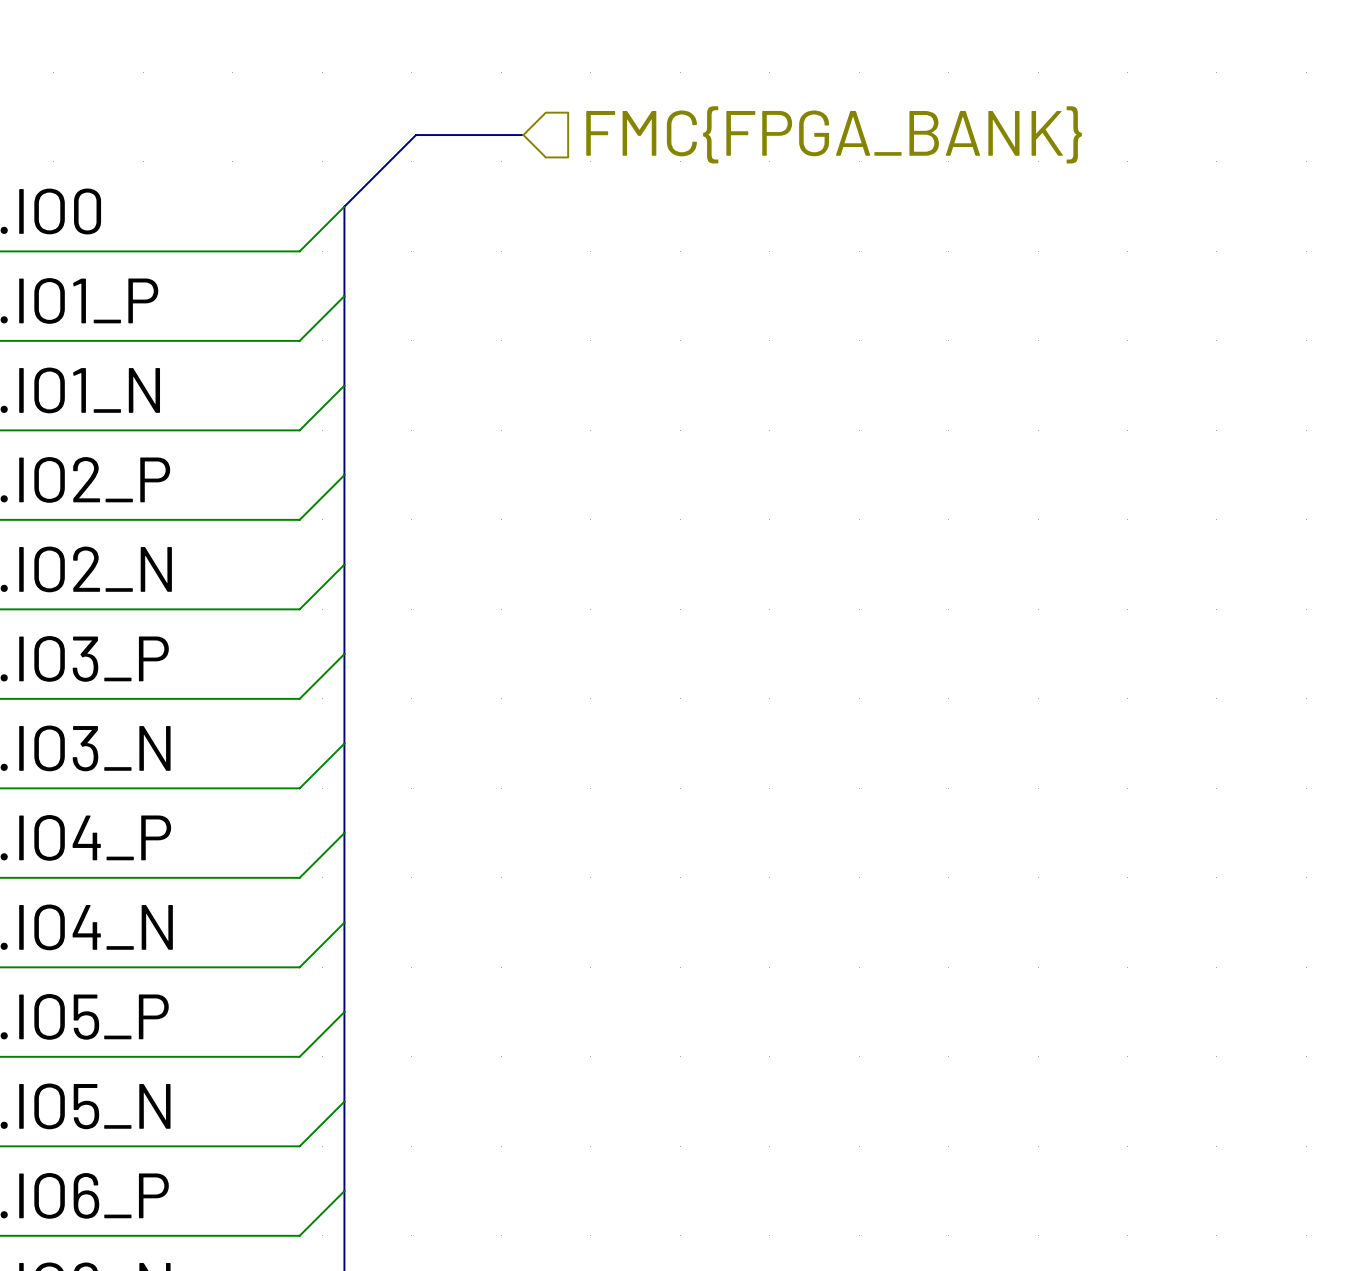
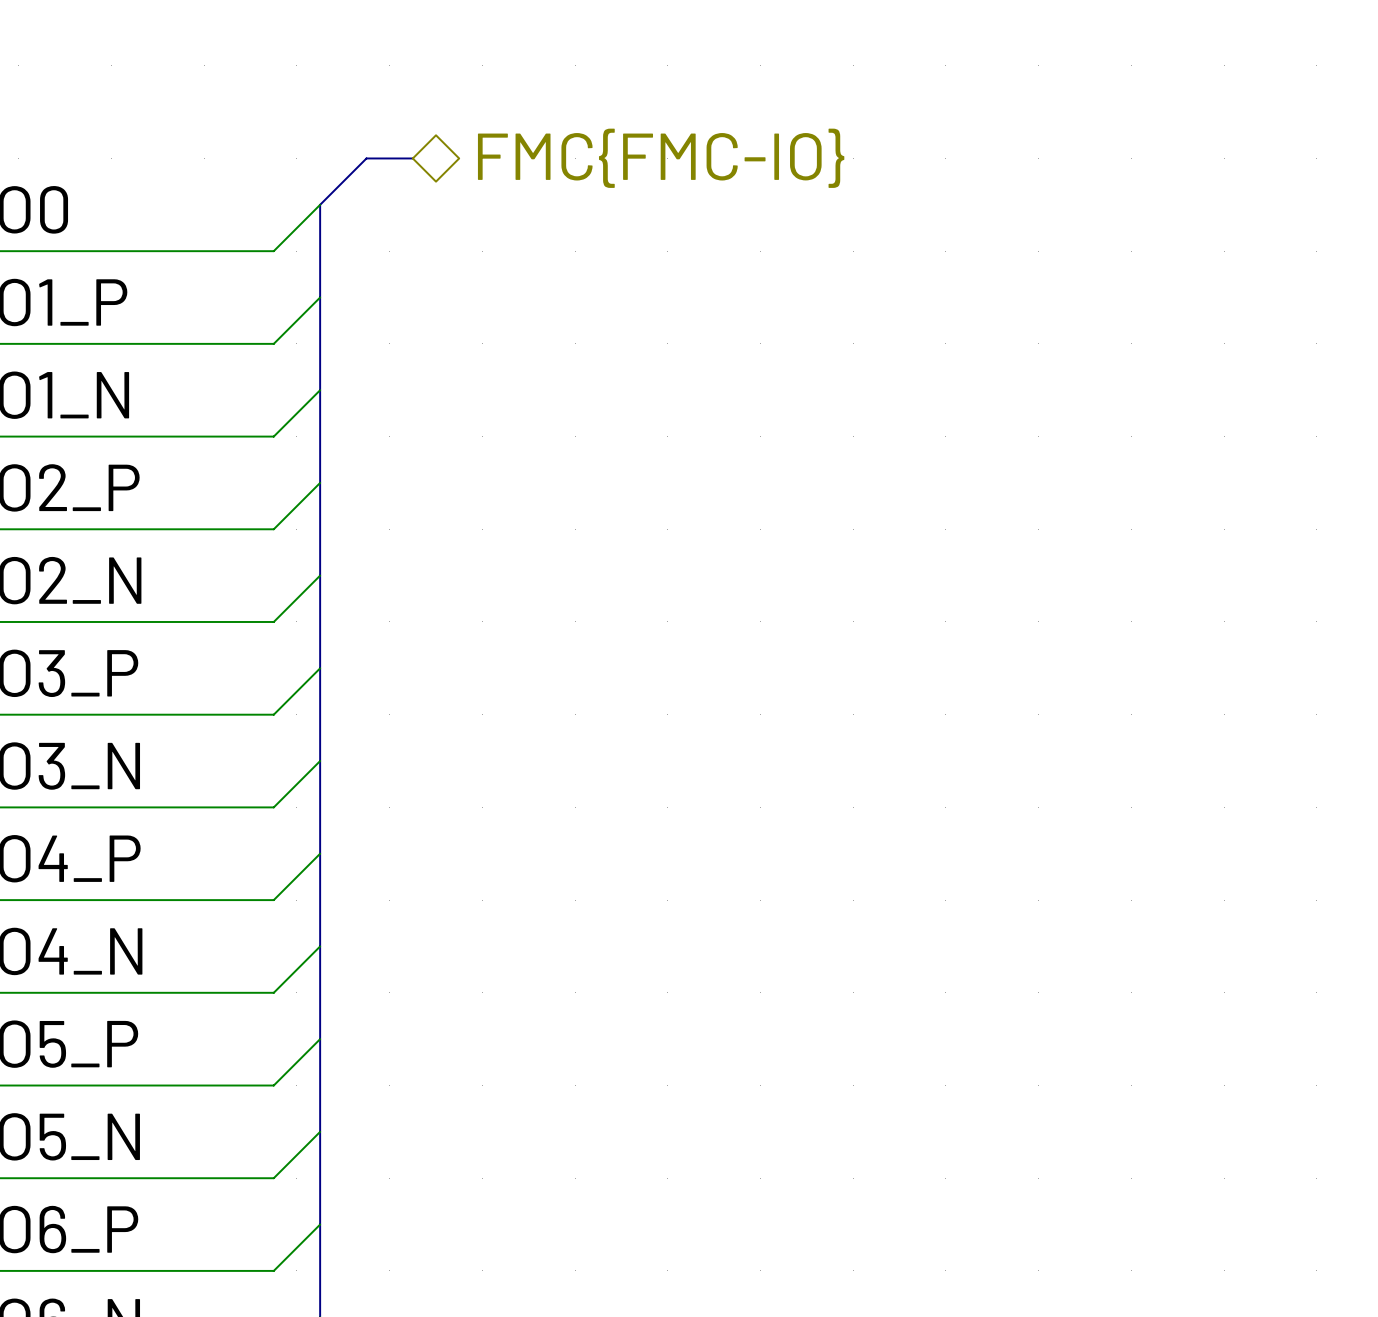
hierarchical label: FMC{FPGA_BANK} (834, 134) -> none
bus: (523, 135) (416, 135) (389, 161) -> (412, 158) (366, 158)
hierarchical label: none -> FMC{FMC-IO} (661, 158)

